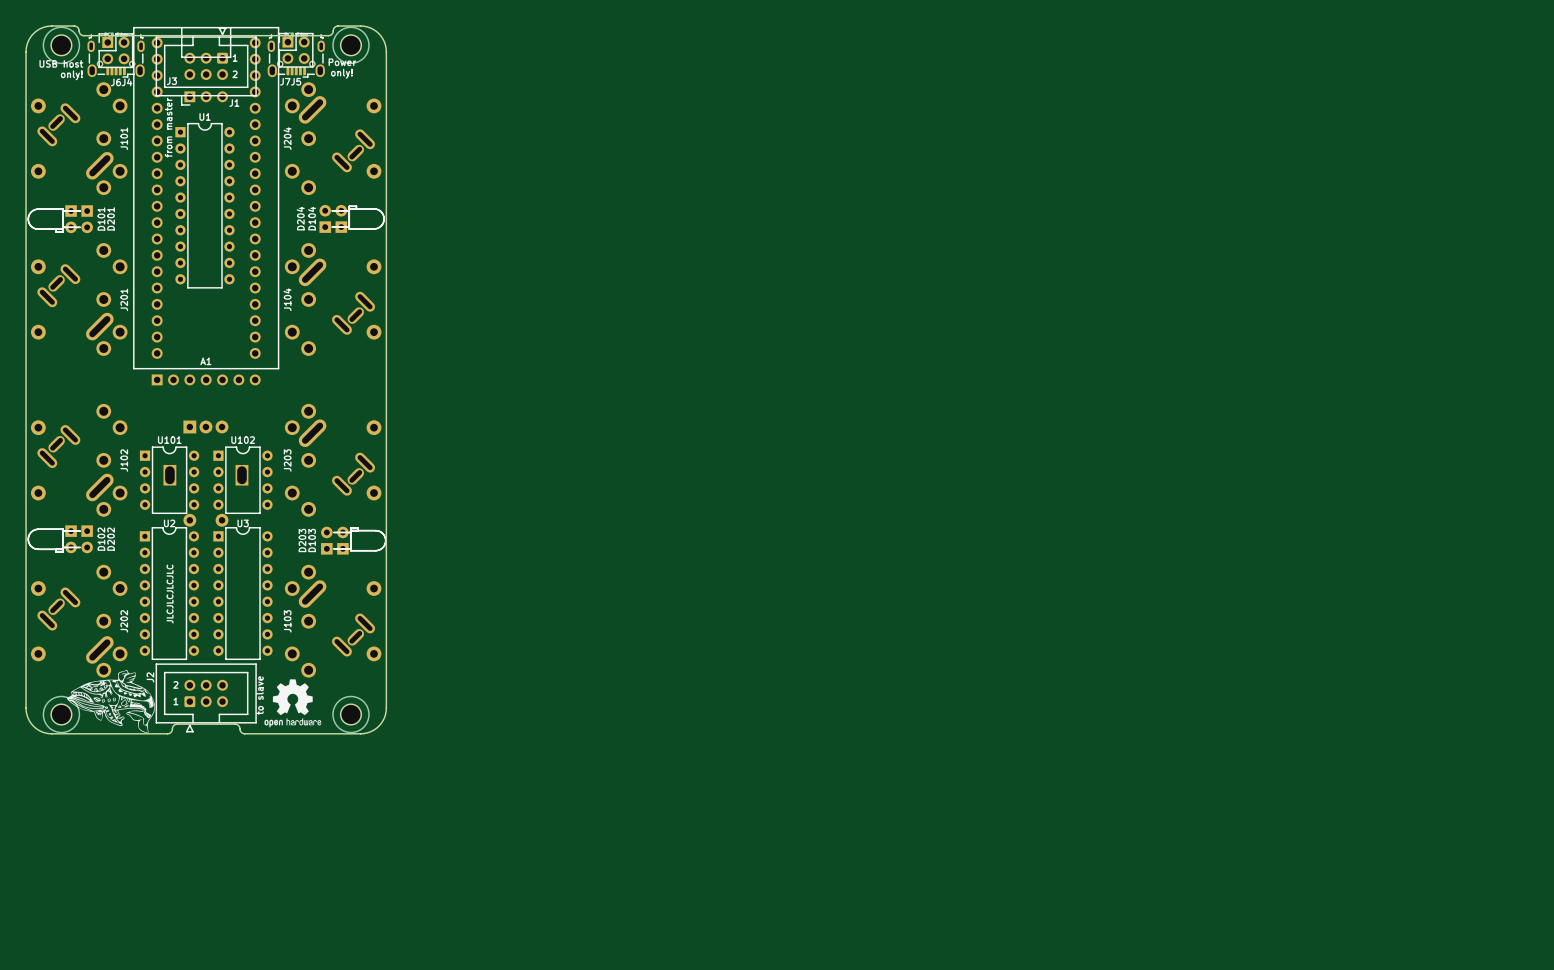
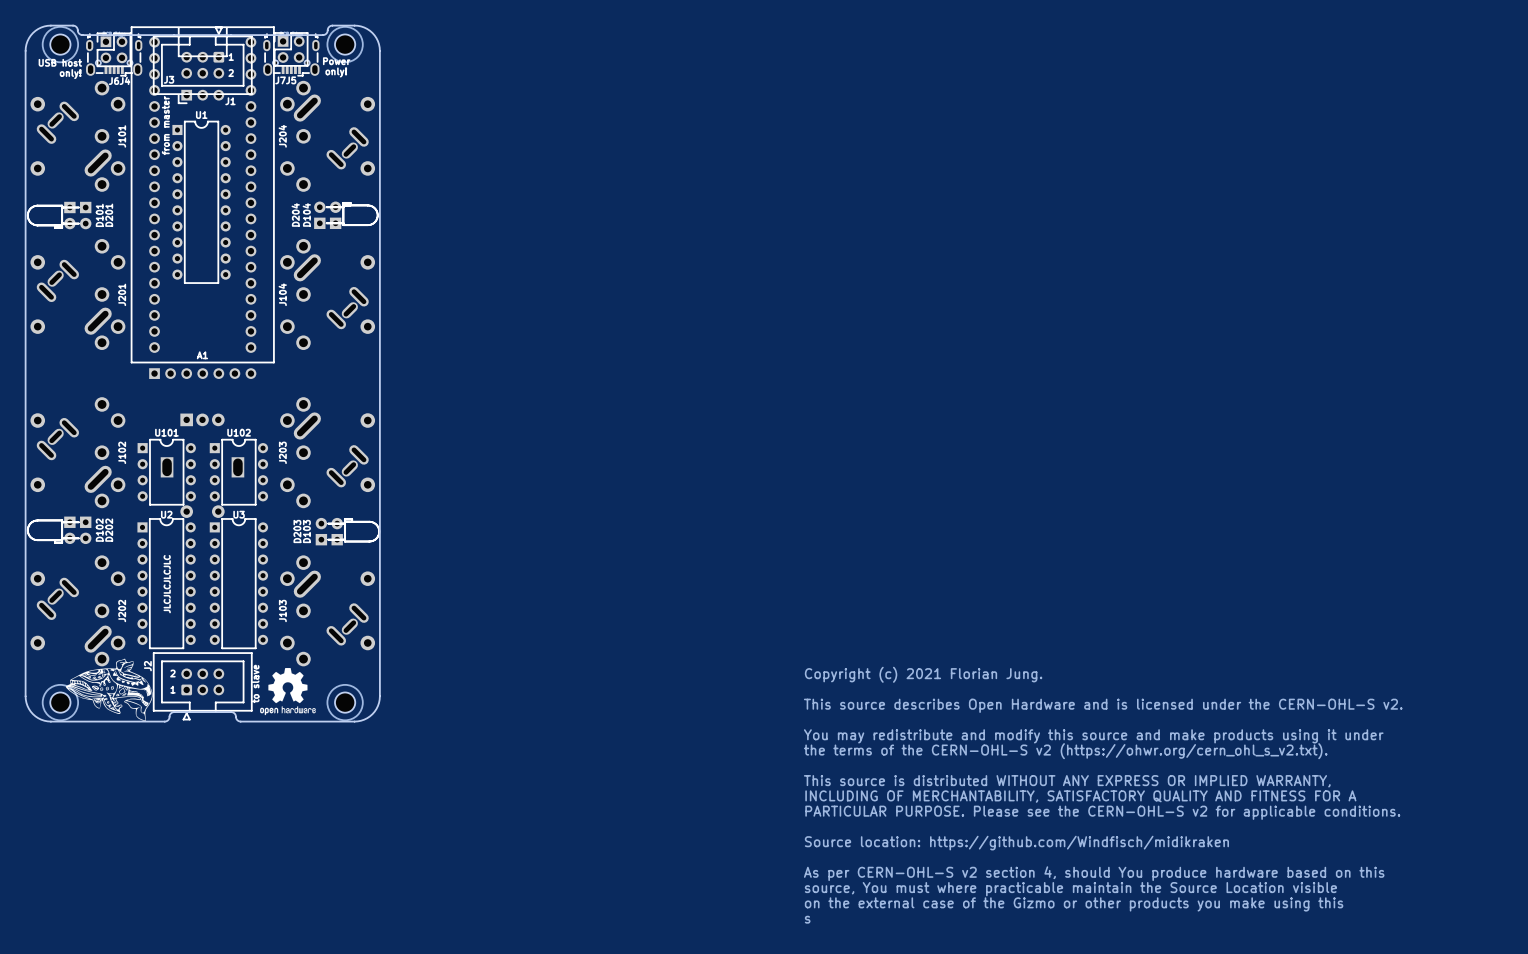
text: none -> Copyright (c) 2021 Florian Jung. (923, 674)
text: none -> This source describes Open Hardware and is licensed under the CERN-OHL-S v2. (1103, 705)
text: none -> You may redistribute and modify this source and make products using it under (1093, 736)
text: none -> the terms of the CERN-OHL-S v2 (https://ohwr.org/cern_ohl_s_v2.txt). (1065, 751)
text: none -> This source is distributed WITHOUT ANY EXPRESS OR IMPLIED WARRANTY, (1067, 781)
text: none -> INCLUDING OF MERCHANTABILITY, SATISFACTORY QUALITY AND FITNESS FOR A (1080, 796)
text: none -> PARTICULAR PURPOSE. Please see the CERN-OHL-S v2 for applicable conditions. (1102, 812)
text: none -> Source location: https://github.com/Windfisch/midikraken (1016, 843)
text: none -> As per CERN-OHL-S v2 section 4, should You produce hardware based on this (1094, 873)
text: none -> source, You must where practicable maintain the Source Location visible (1070, 889)
text: none -> on the external case of the Gizmo or other products you make using this (1074, 904)
text: none -> s (807, 919)

